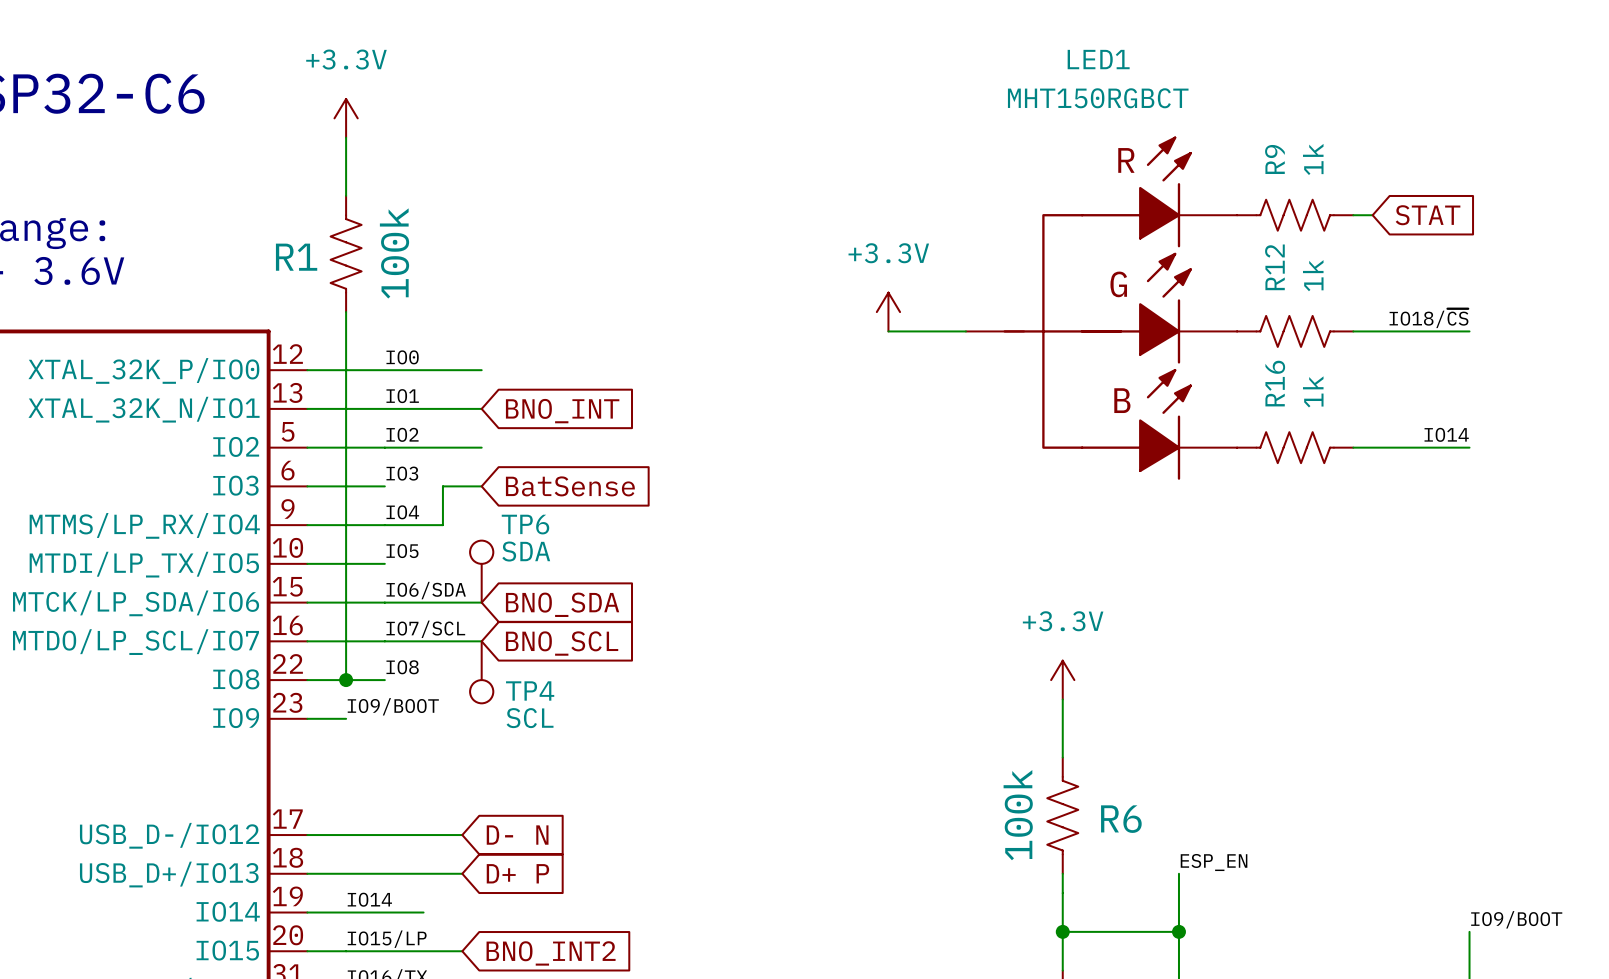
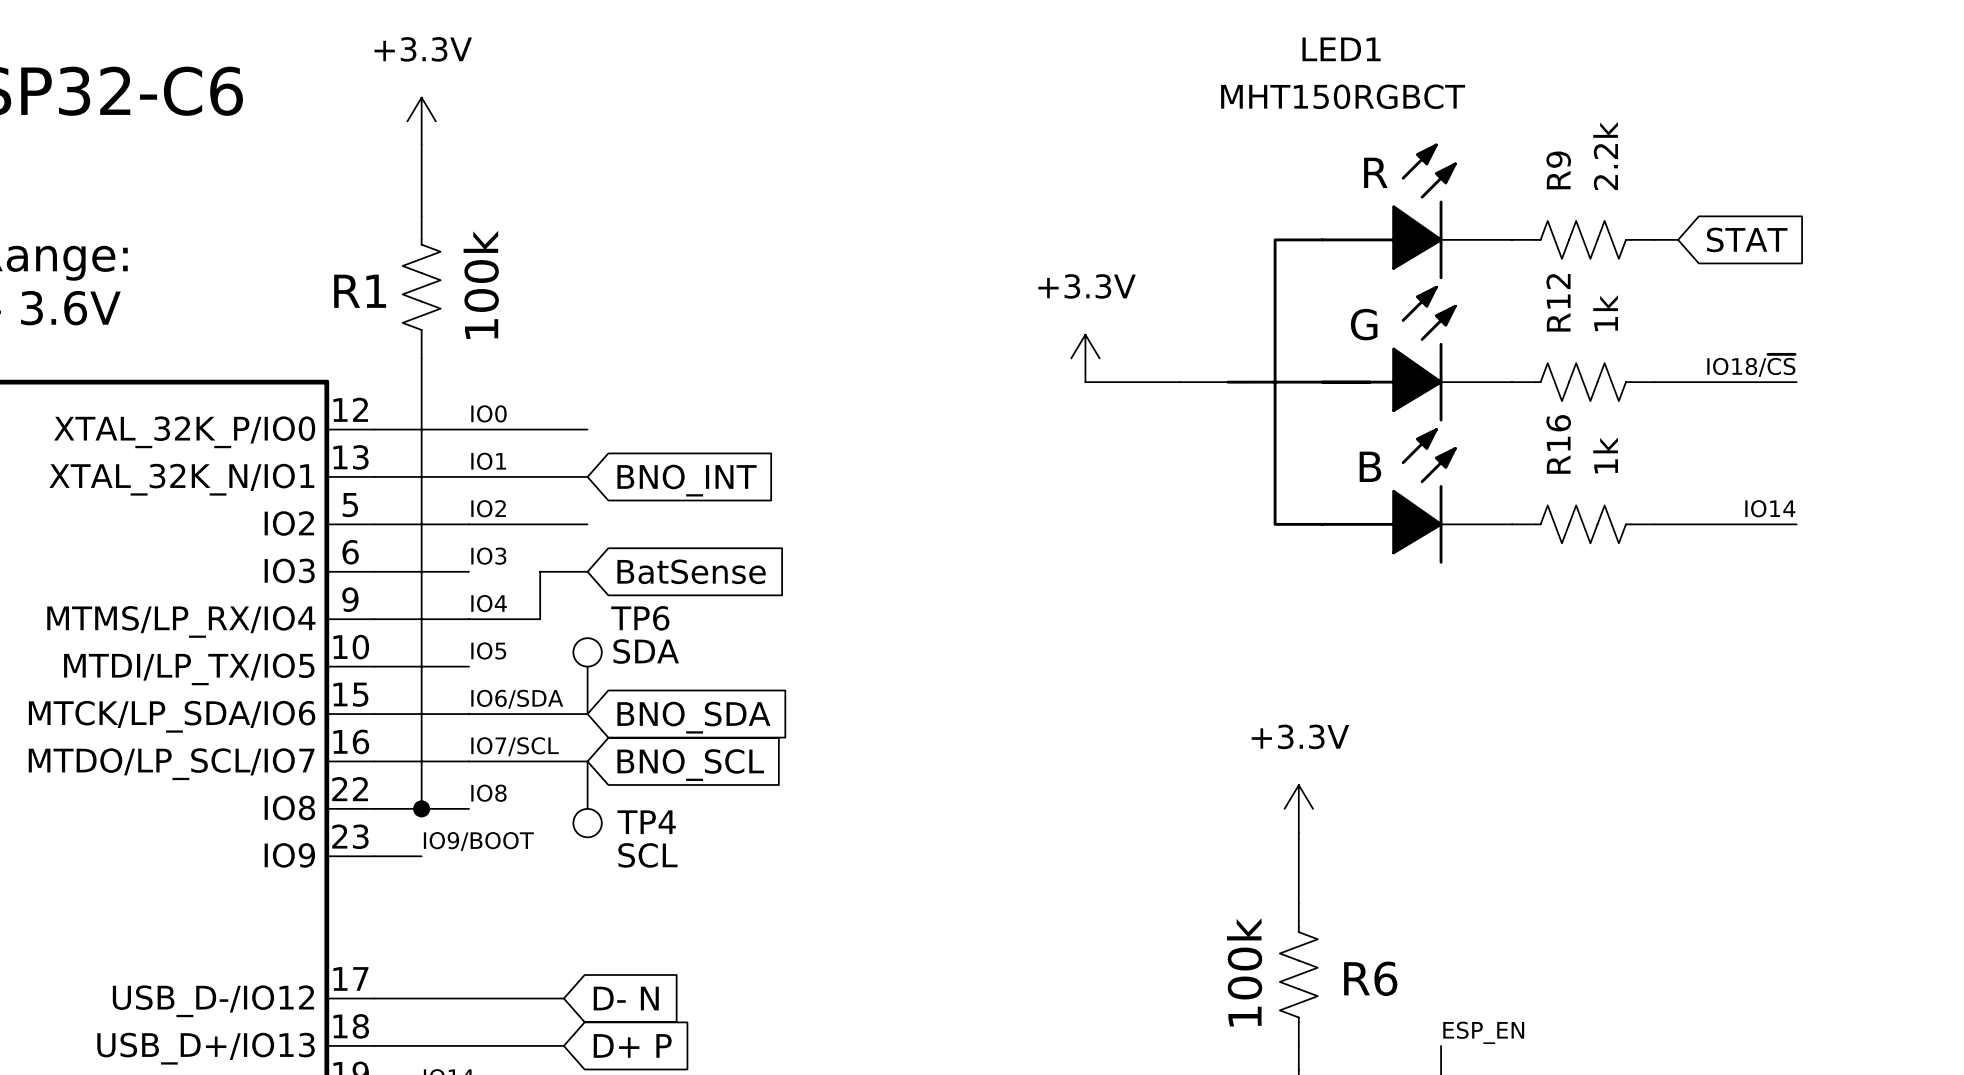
R9 value: 1k (1313, 159) -> 2.2k (1605, 156)

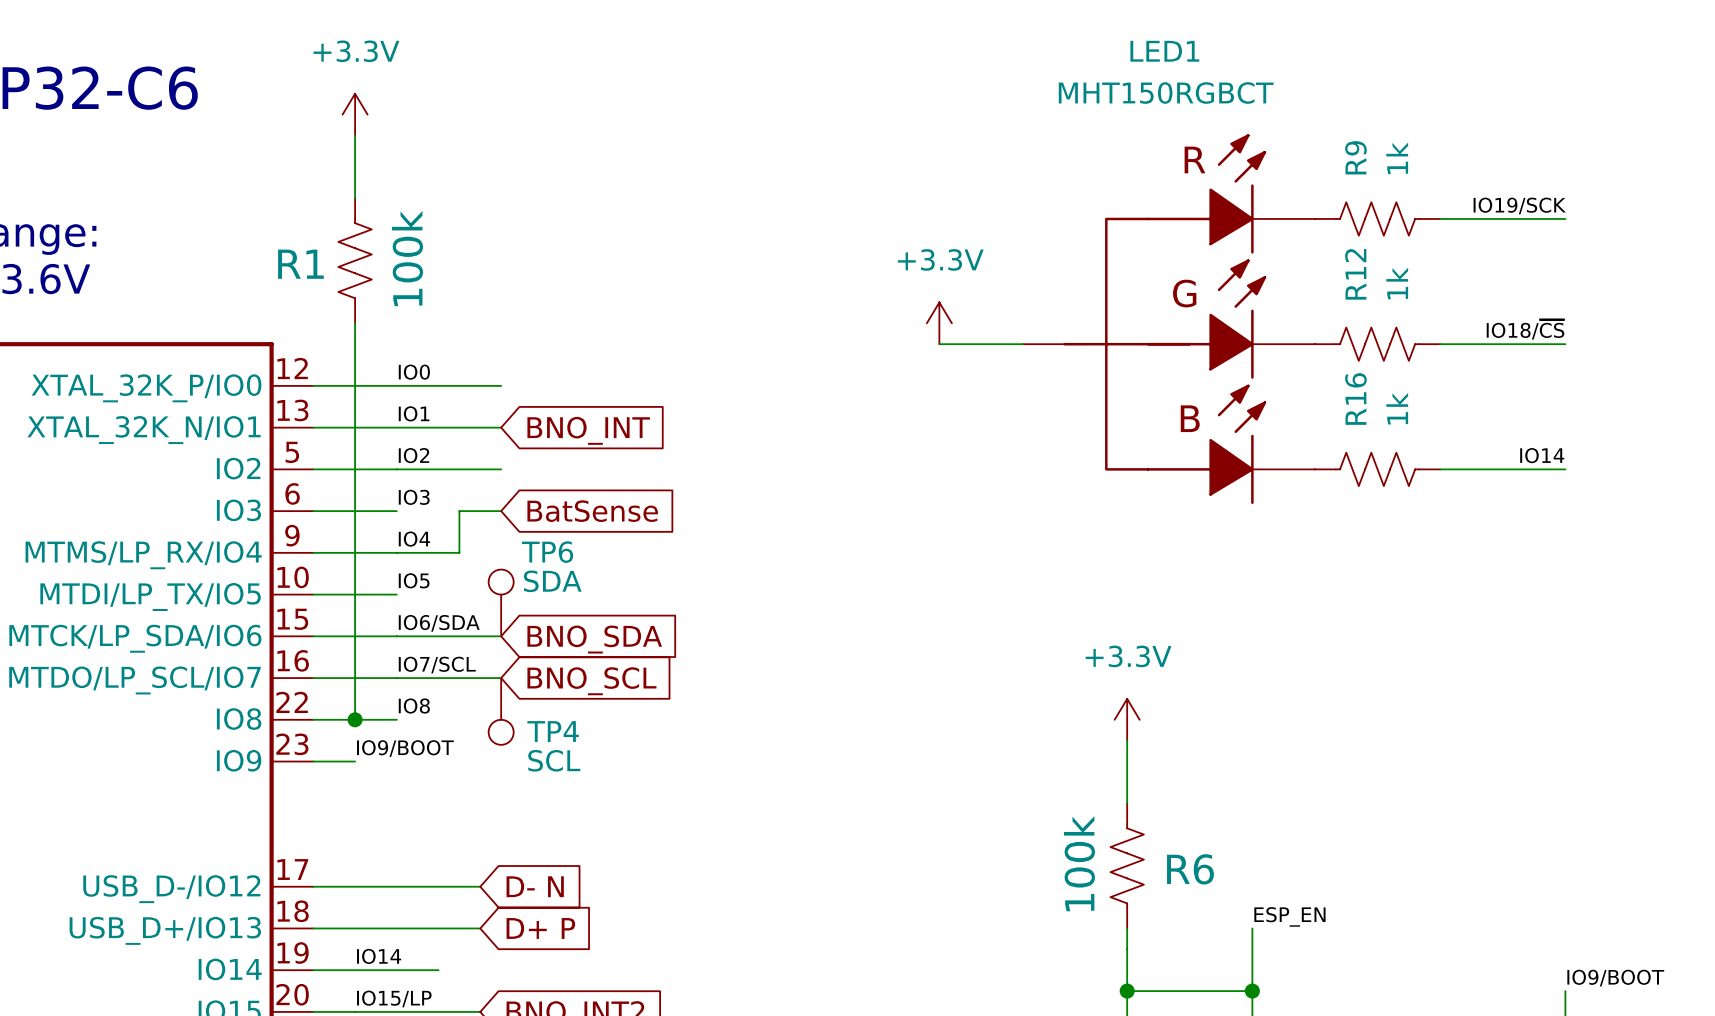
R9 value: 2.2k (1605, 156) -> 1k (1397, 158)
label: none -> IO19/SCK (1519, 205)
wire: none -> (1461, 218) (1565, 218)
global label: STAT (1747, 239) -> none

